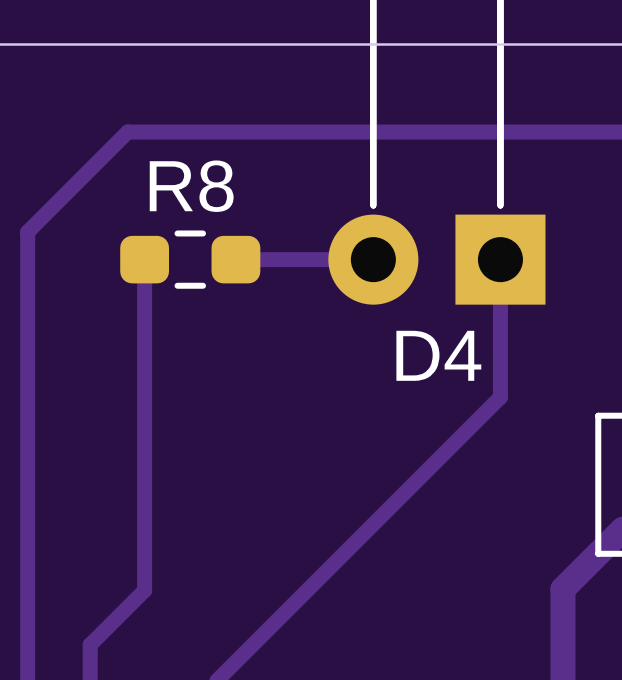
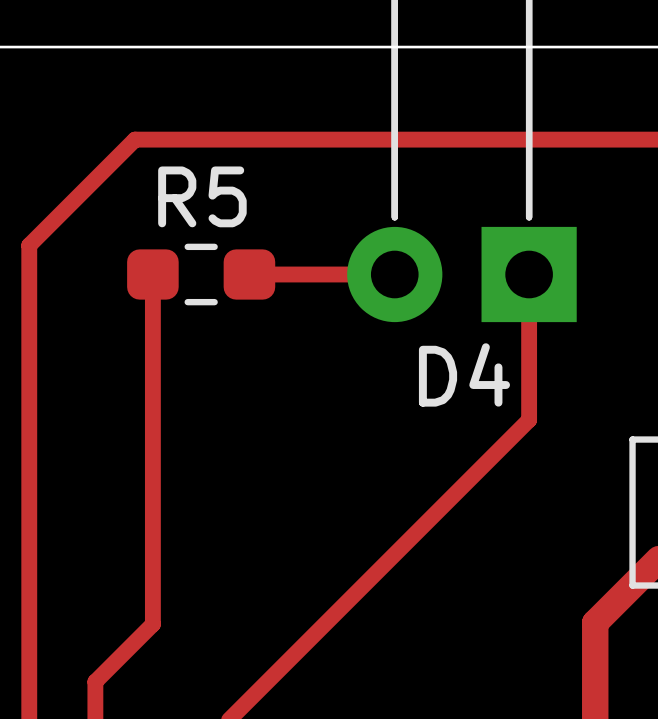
R8 name: R8 (191, 186) -> R5 (202, 196)

